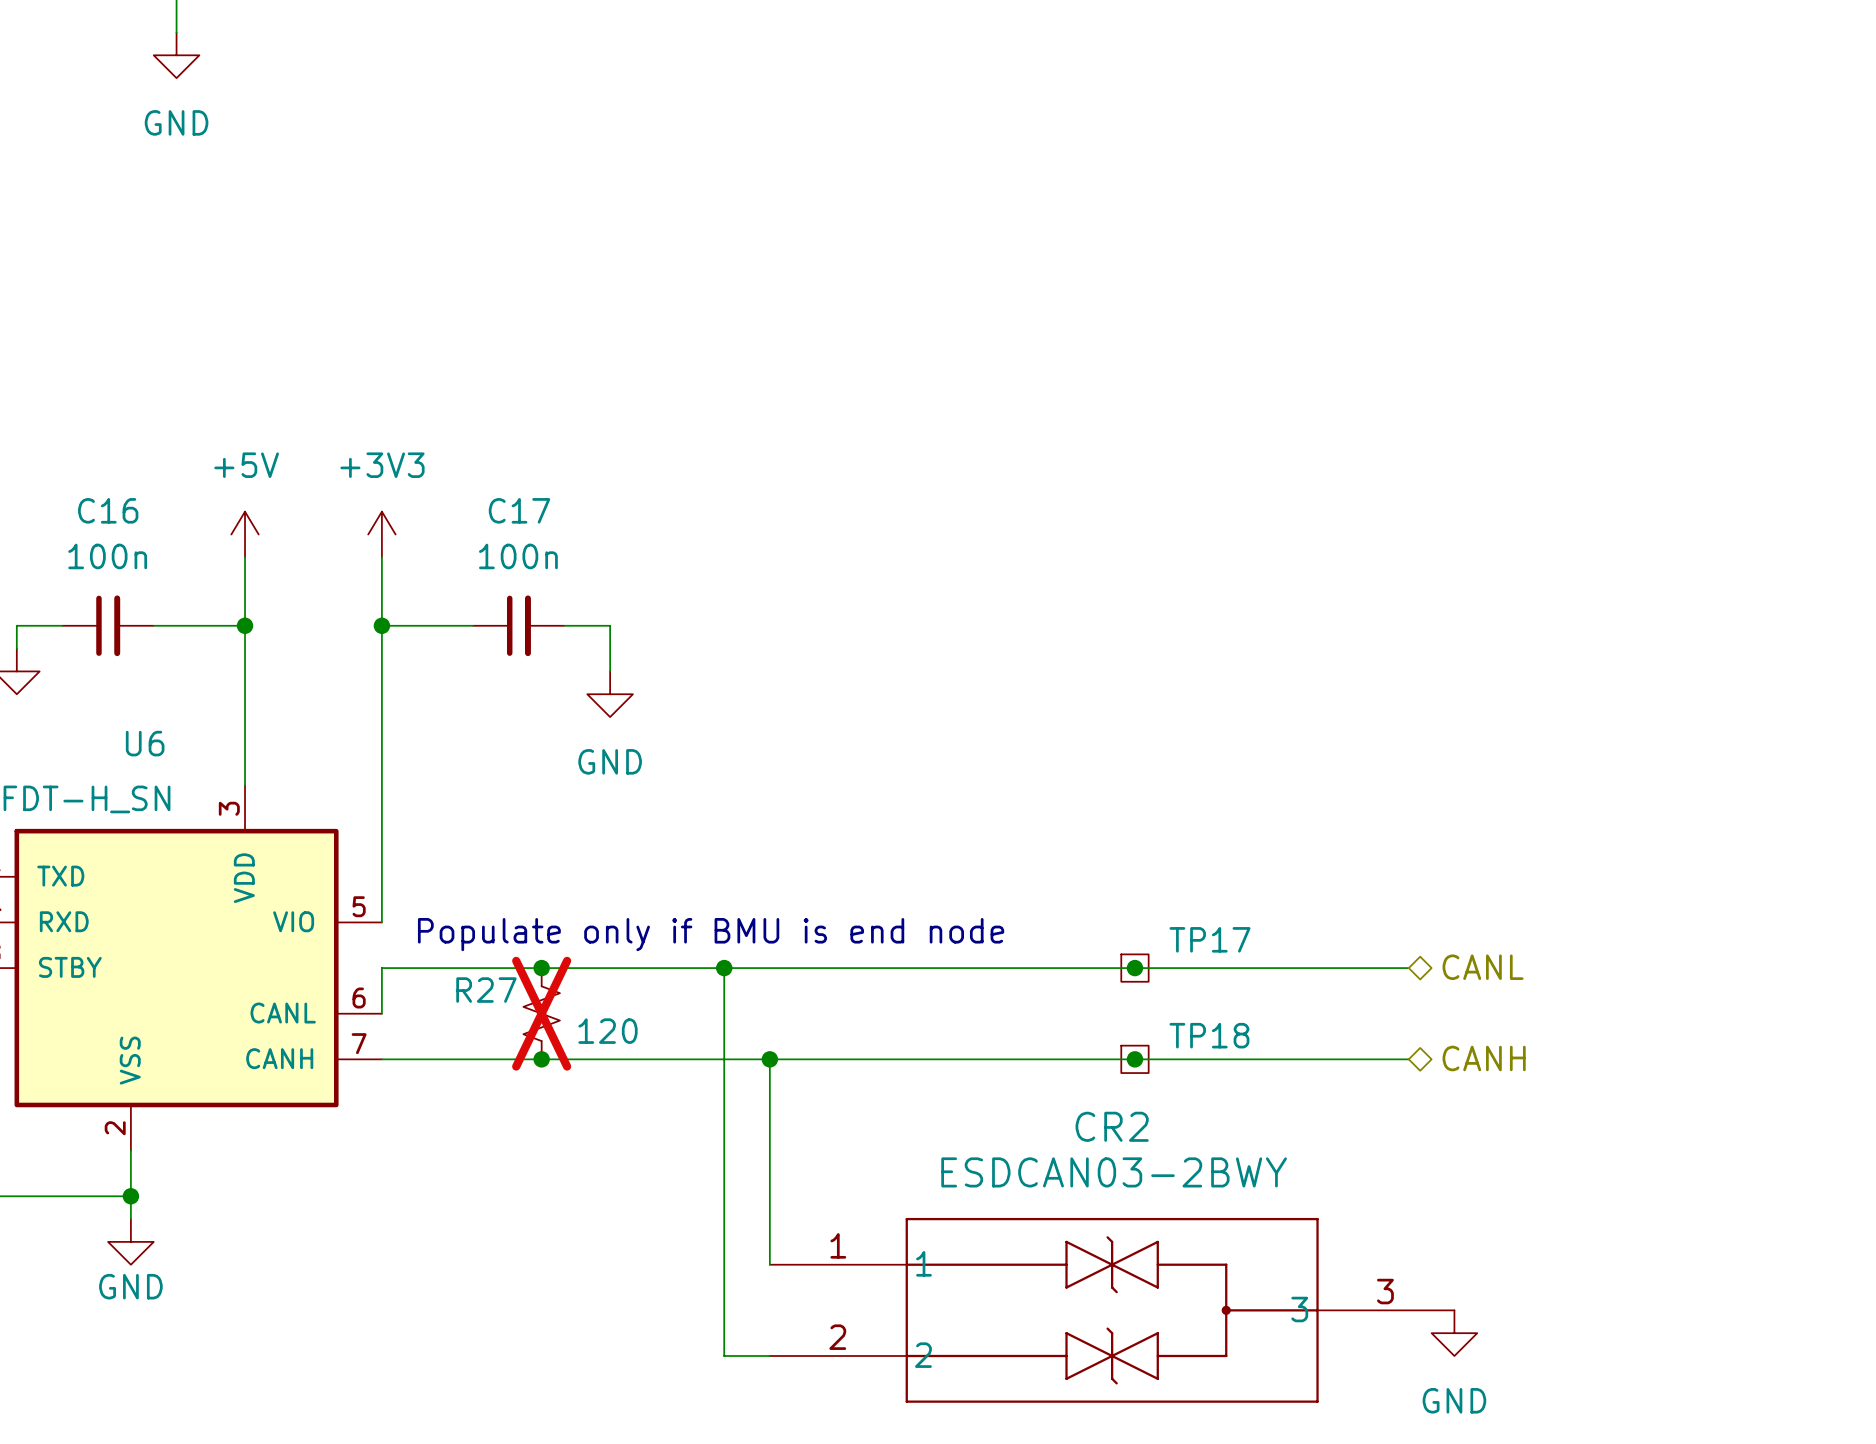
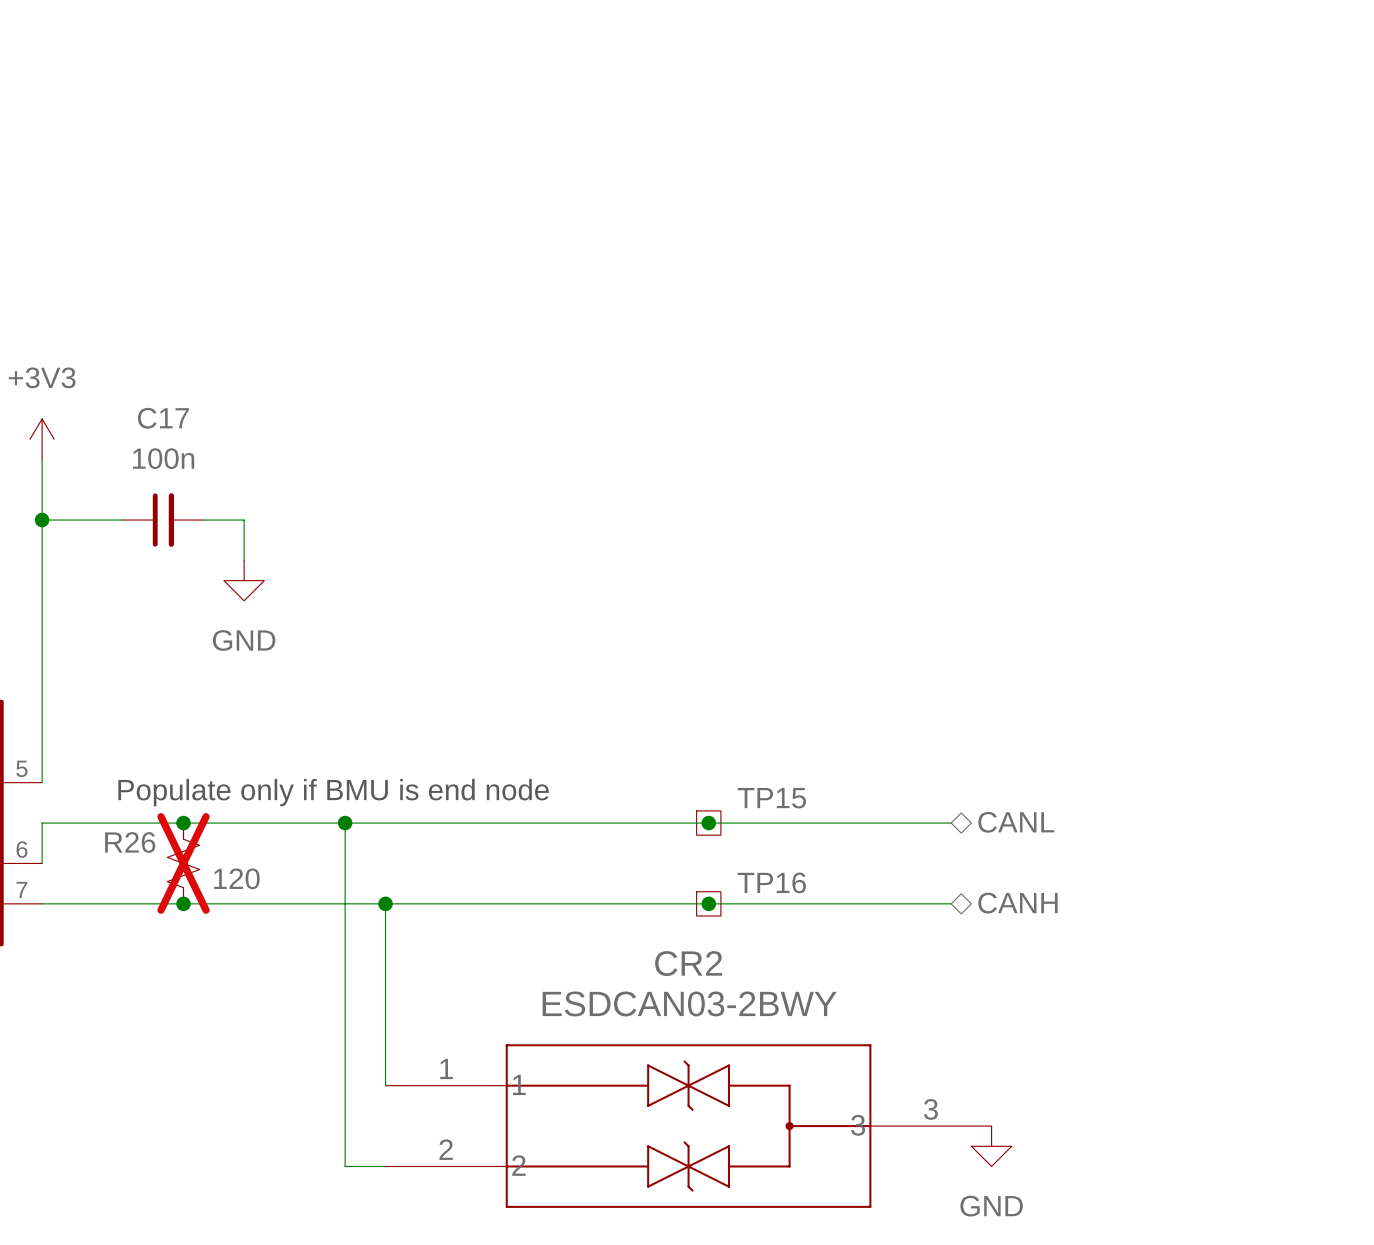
TP17 name: TP17 (1210, 939) -> TP15 (771, 798)
R27 name: R27 (486, 990) -> R26 (130, 842)
TP18 name: TP18 (1209, 1035) -> TP16 (771, 882)

